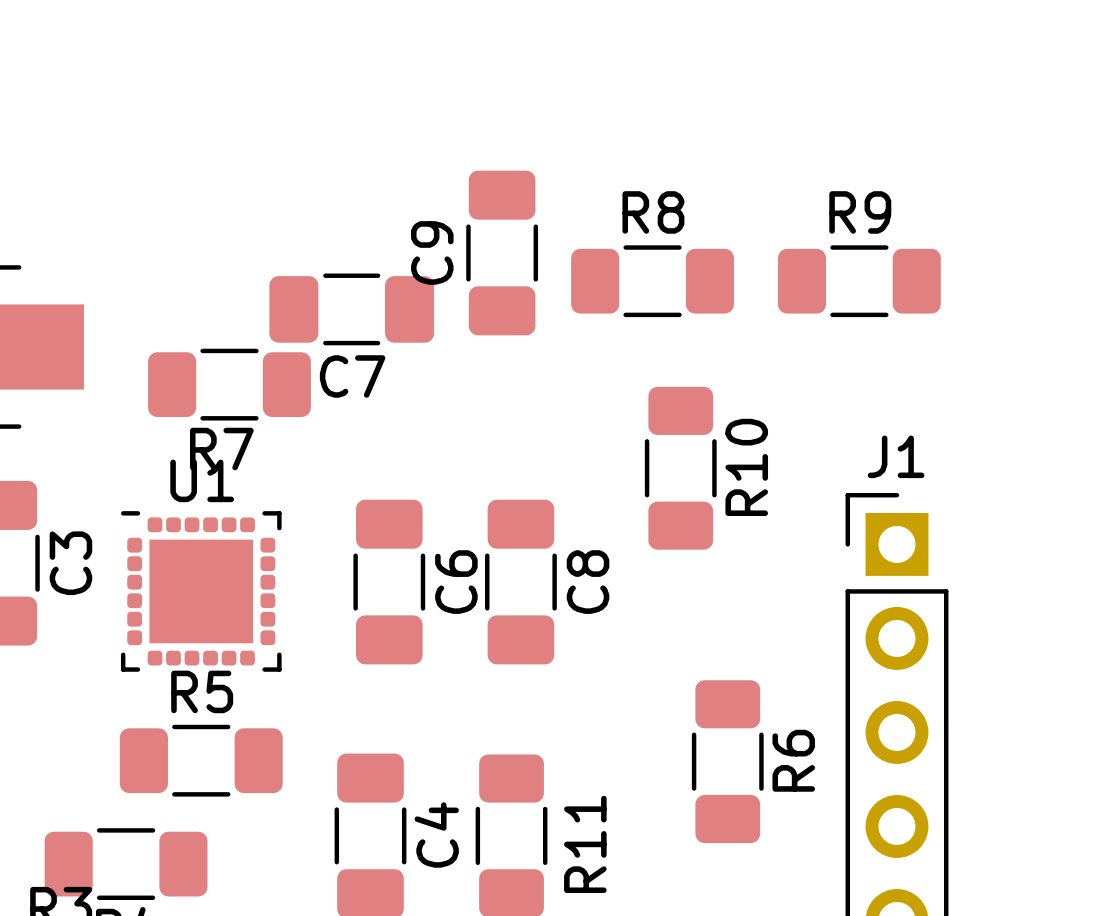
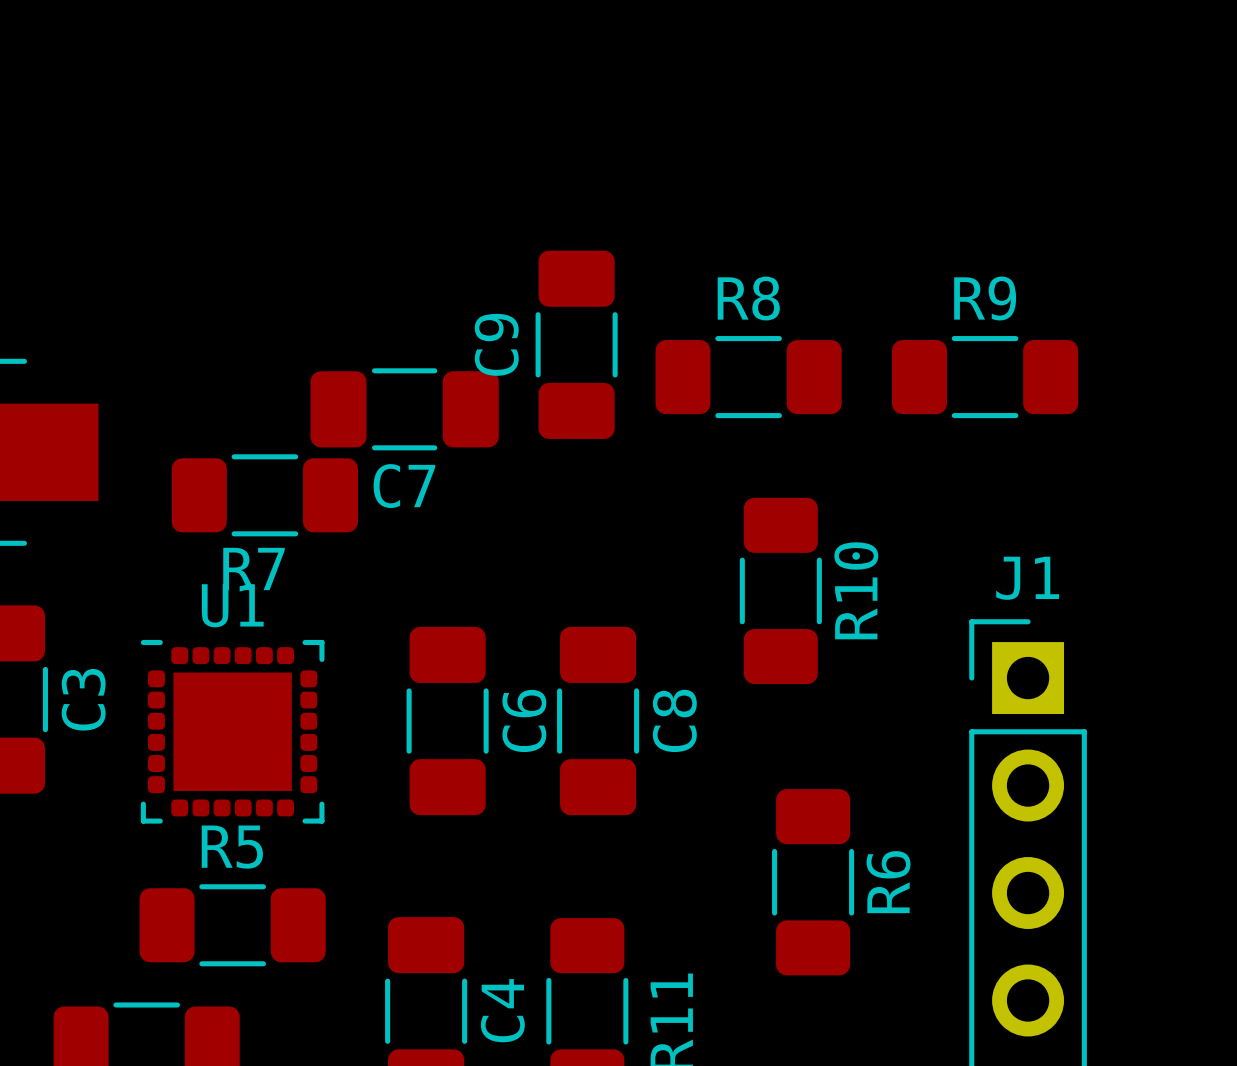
R6 position: (727, 761) -> (813, 882)

